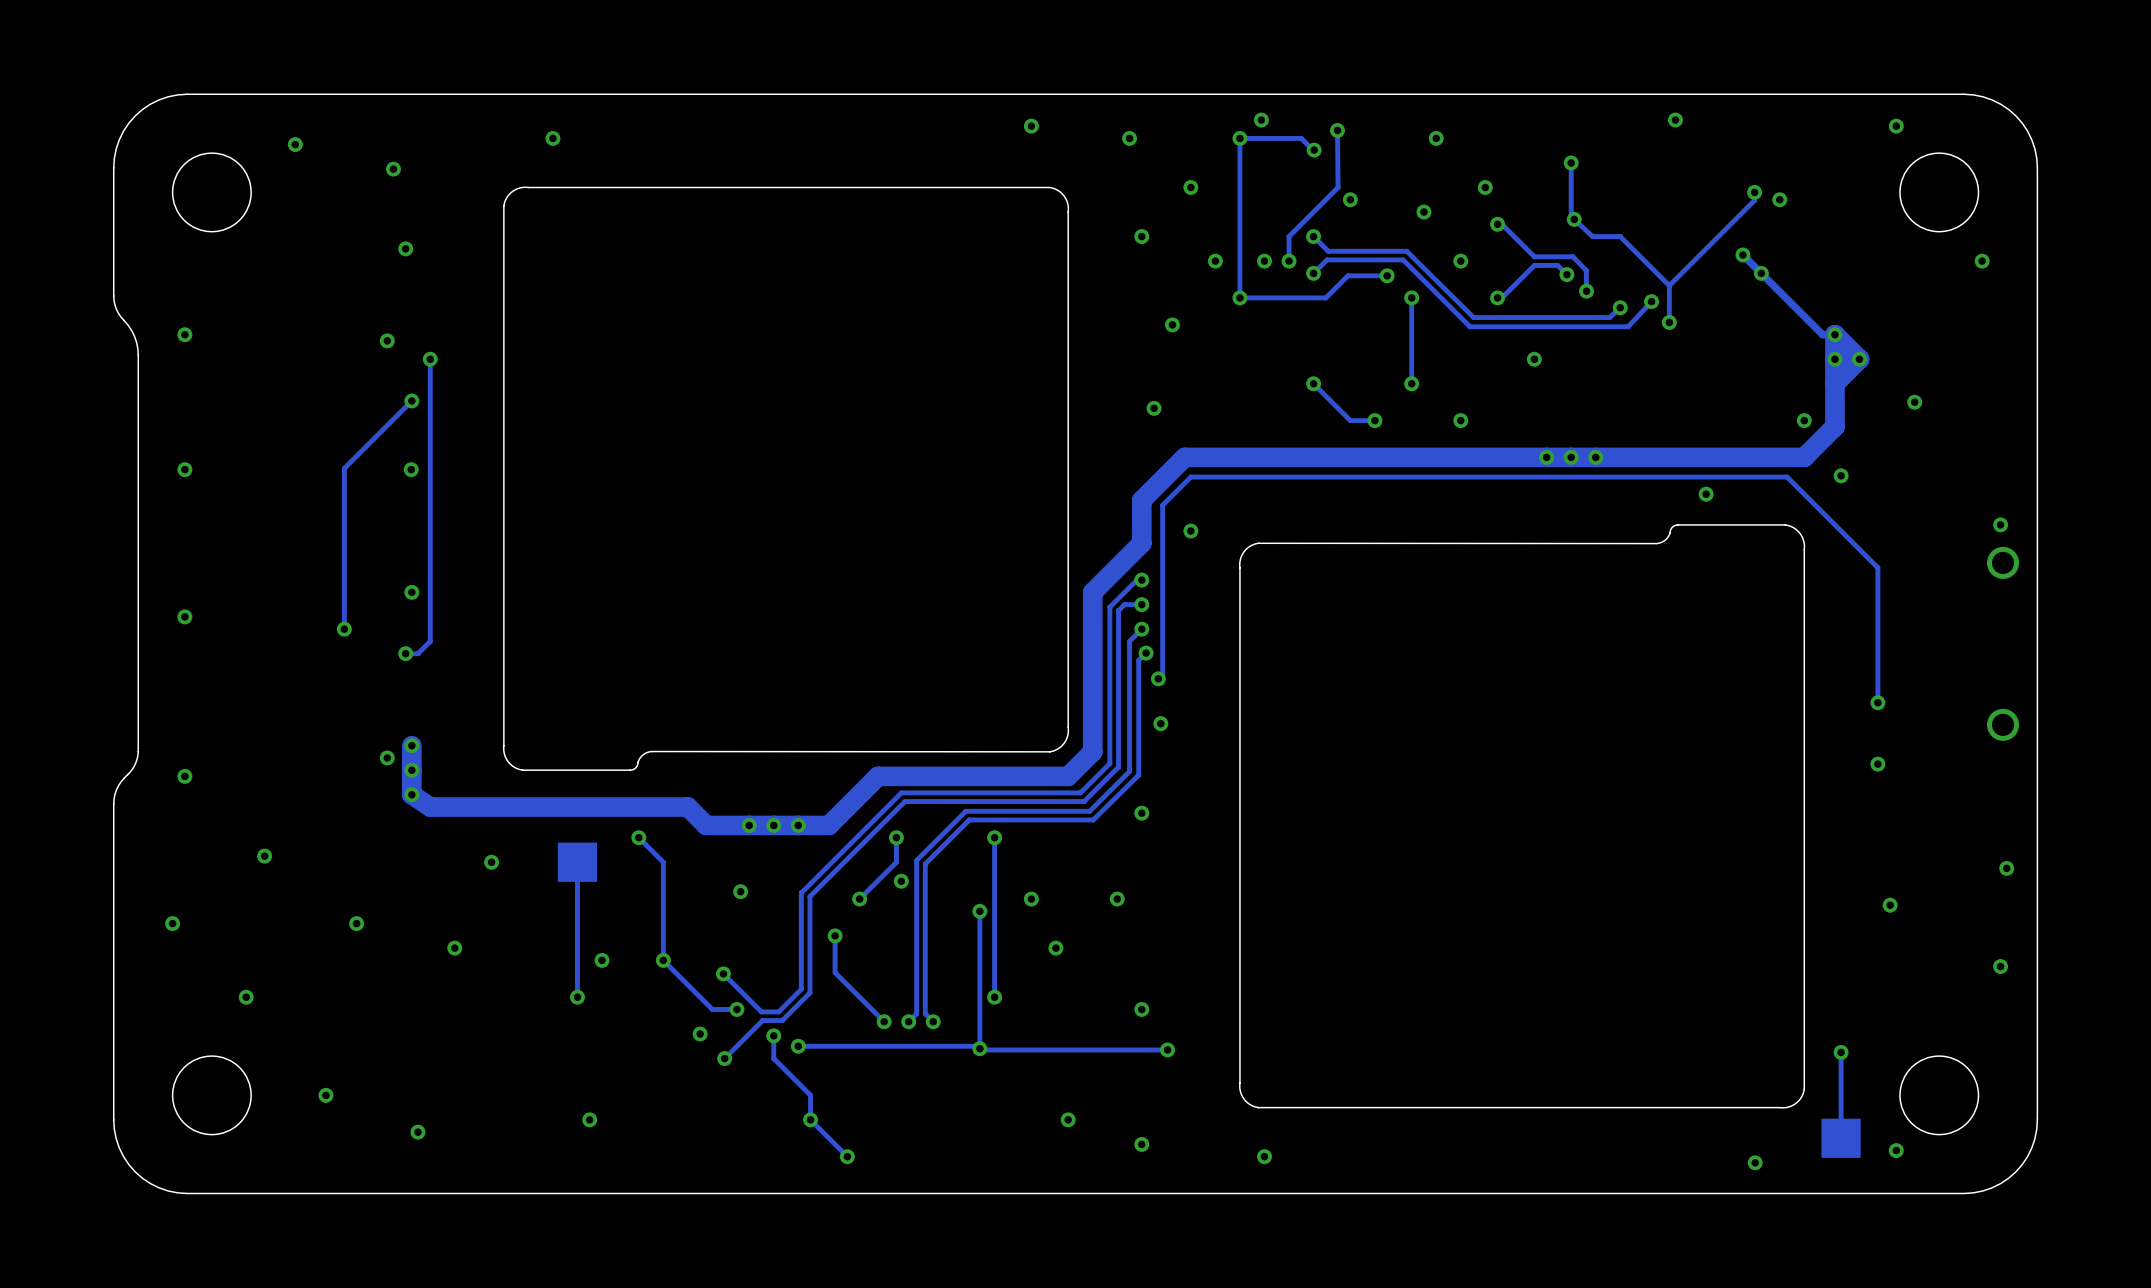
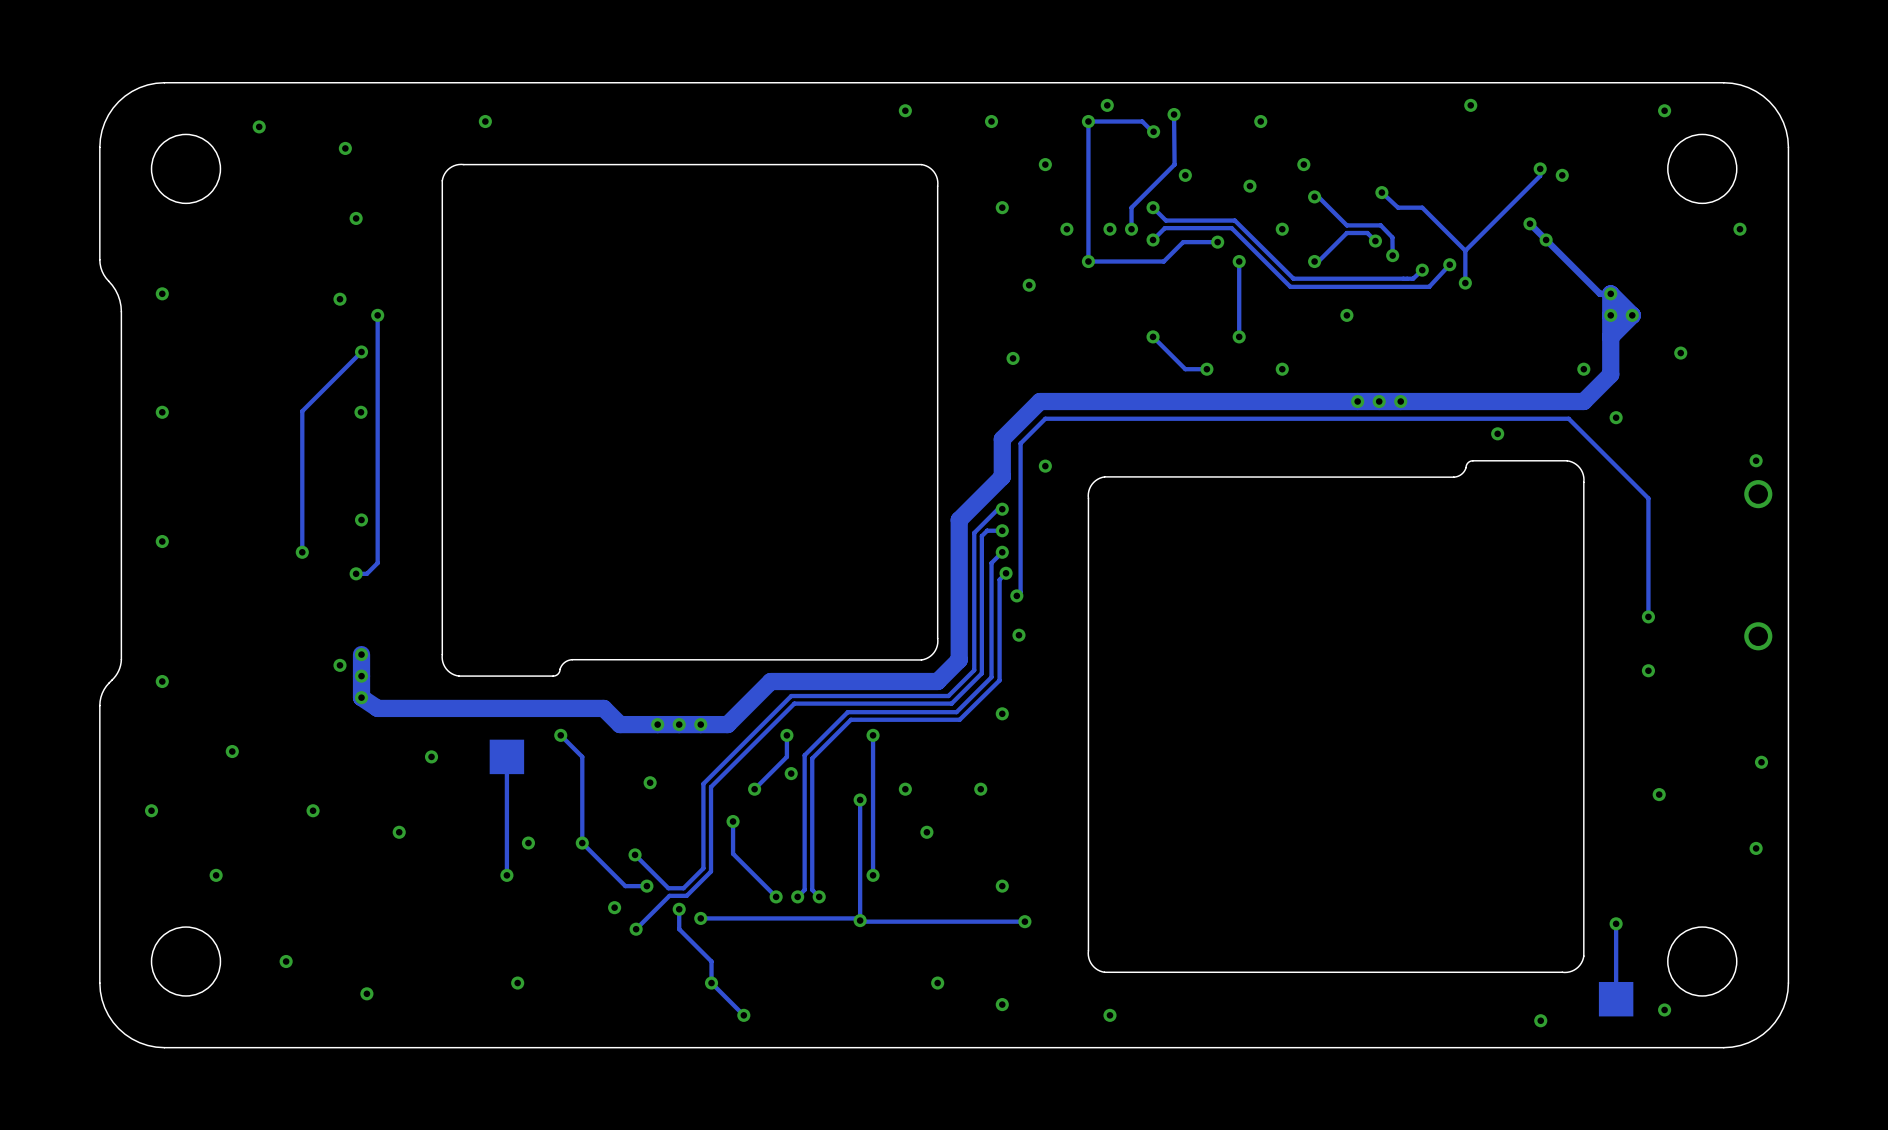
track: (1571, 162) (1571, 216) (1574, 219) -> none
via: (1571, 162) -> none

